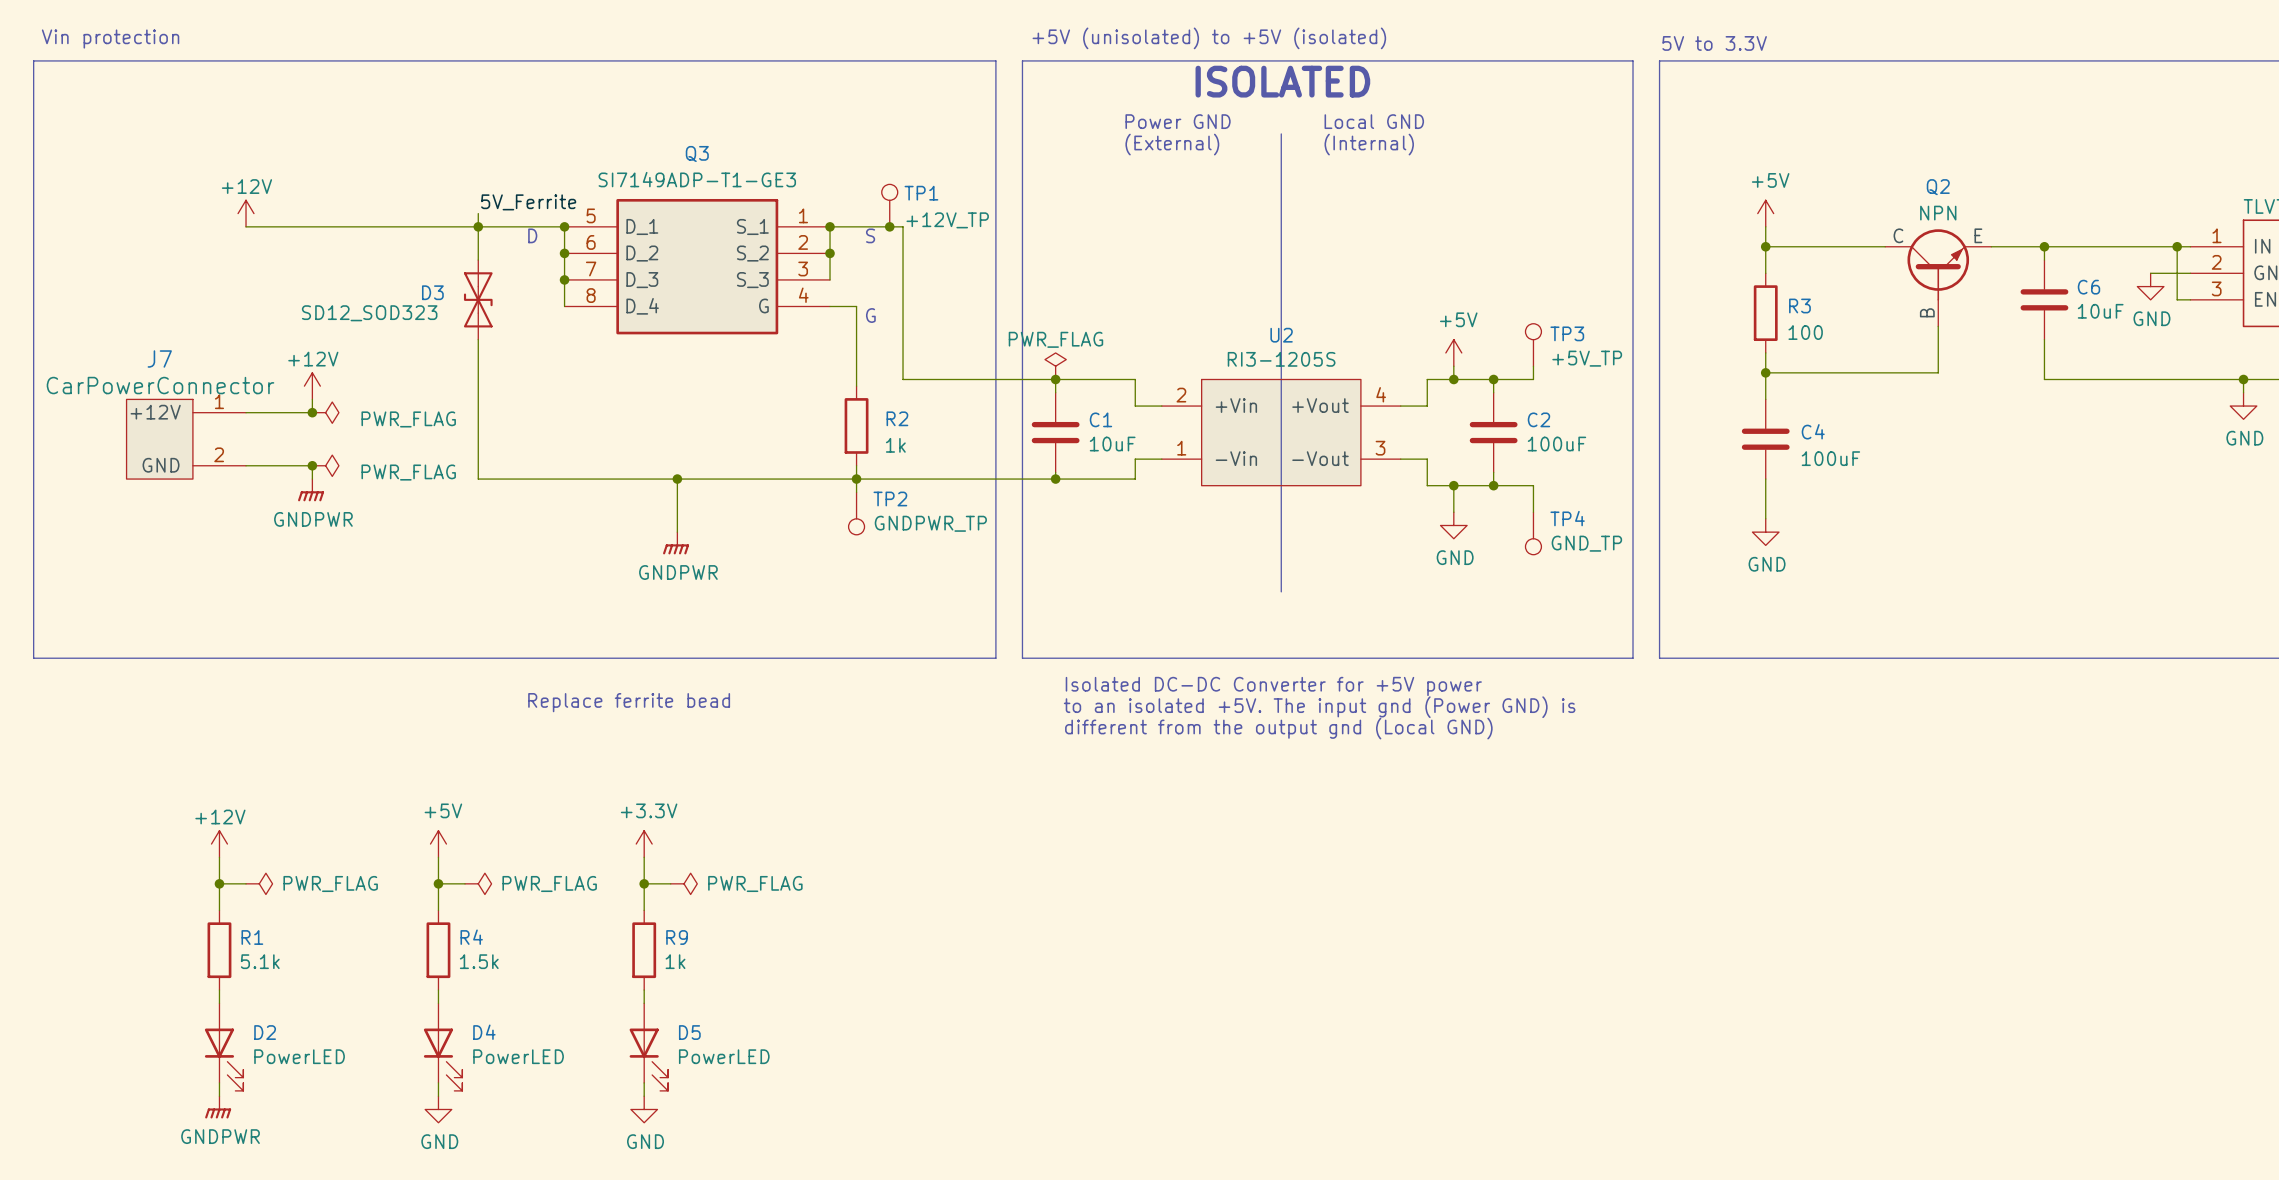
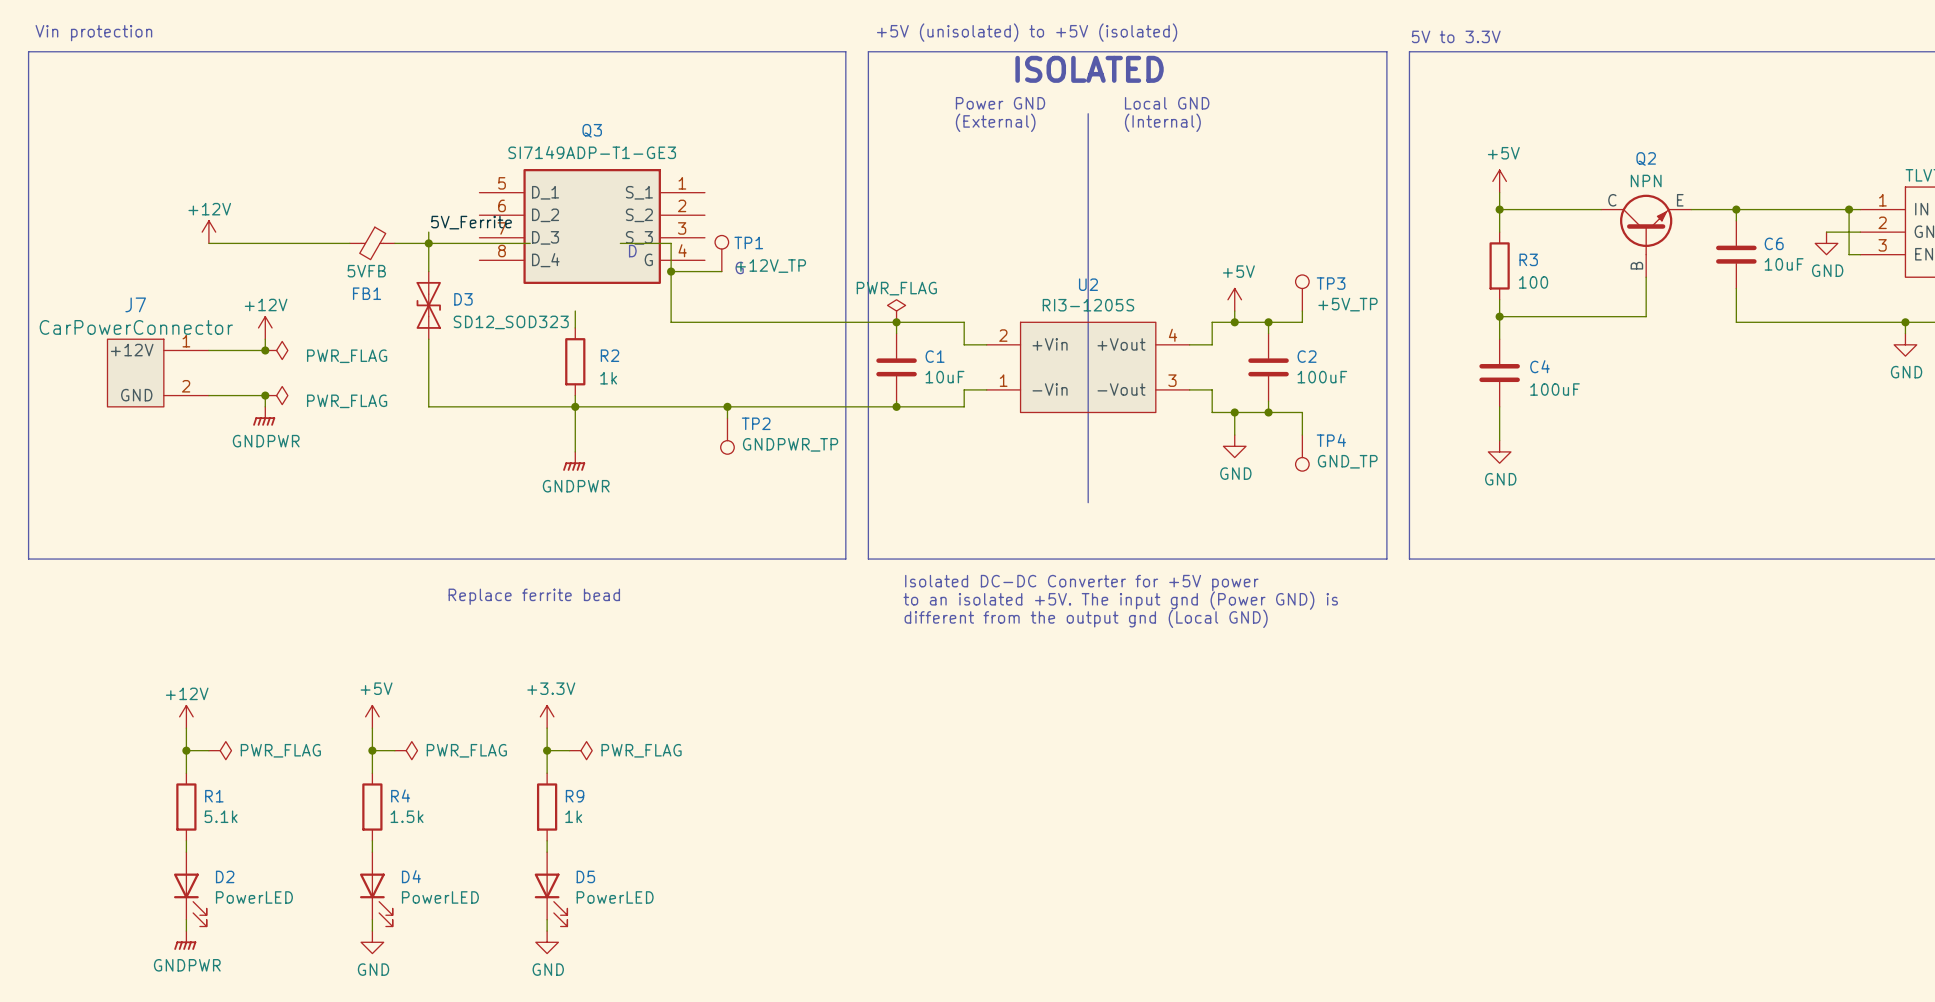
label position: 5V_Ferrite (528, 202) -> 5V_Ferrite (471, 222)
TP1 position: (889, 205) -> (721, 253)
power symbol position: +12V (246, 213) -> +12V (208, 232)
wire: (478, 213) (478, 260) -> (428, 232) (428, 271)
wire: (246, 226) (564, 226) (564, 306) -> none
junction: (478, 226) -> none
junction: (564, 226) -> none
junction: (830, 226) -> none
junction: (889, 226) -> none
text position: D (532, 235) -> D (632, 251)
text: S (870, 235) -> none
junction: (564, 253) -> none
junction: (830, 253) -> none
junction: (564, 279) -> none
wire: (830, 279) (830, 226) (903, 226) (903, 379) -> (620, 243) (671, 243) (671, 322) (766, 322)
wire: none -> (208, 243) (349, 243)
FB1: none -> 5VFB (372, 243)
wire: none -> (394, 243) (530, 243)
junction: none -> (428, 243)
D3 name position: D3 (432, 292) -> D3 (463, 299)
D3 position: (478, 299) -> (428, 305)
wire: (830, 306) (856, 306) (856, 386) -> none
D3 value position: SD12_SOD323 (369, 313) -> SD12_SOD323 (511, 322)
wire: none -> (671, 271) (721, 271)
junction: none -> (671, 271)
wire: (478, 339) (478, 479) (504, 479) -> (428, 339) (428, 406)
wire: none -> (575, 311) (575, 327)
R2 position: (856, 425) -> (575, 361)
wire: (856, 465) (856, 479) -> (575, 395) (575, 406)

